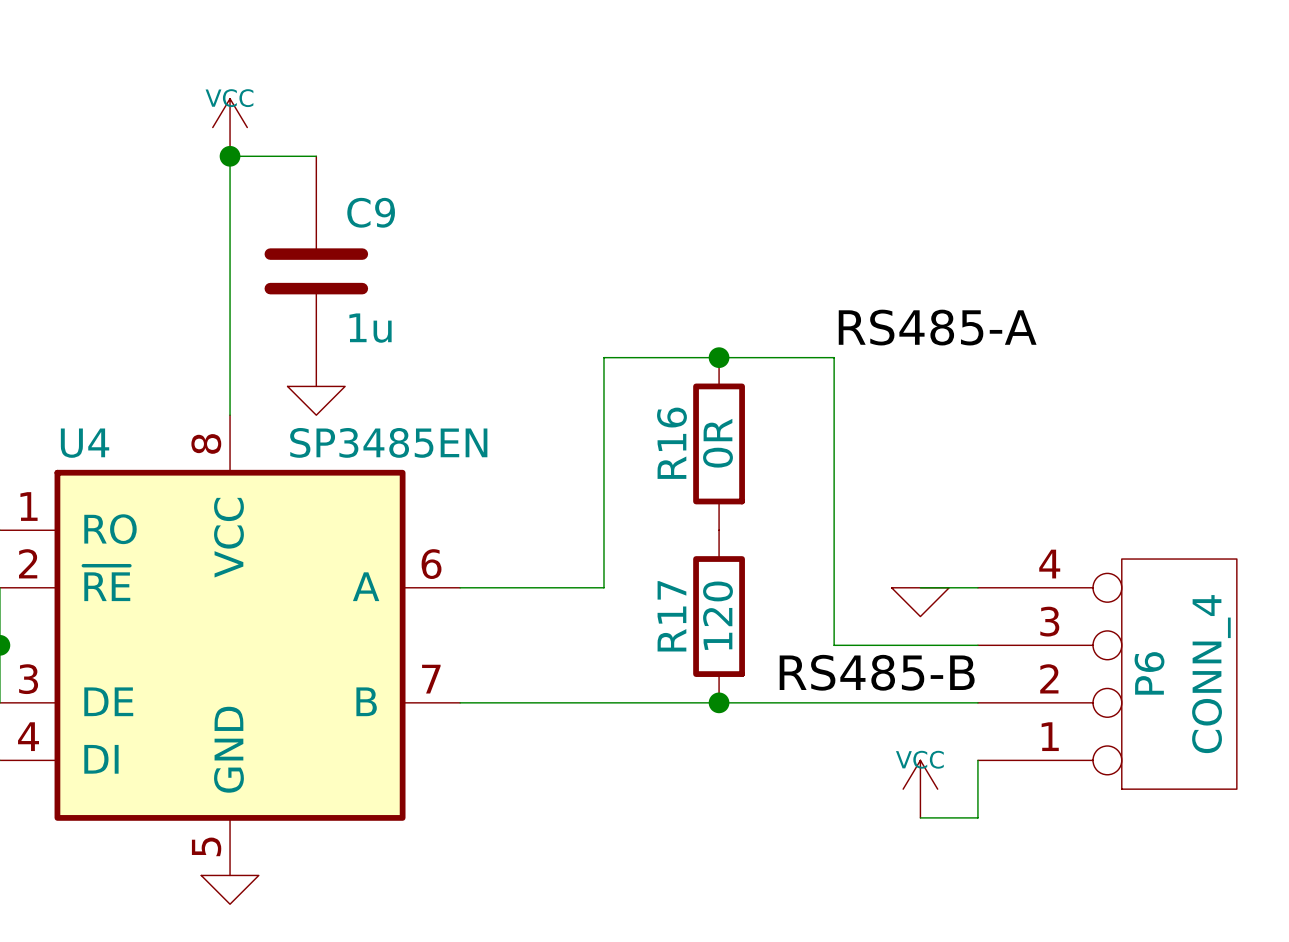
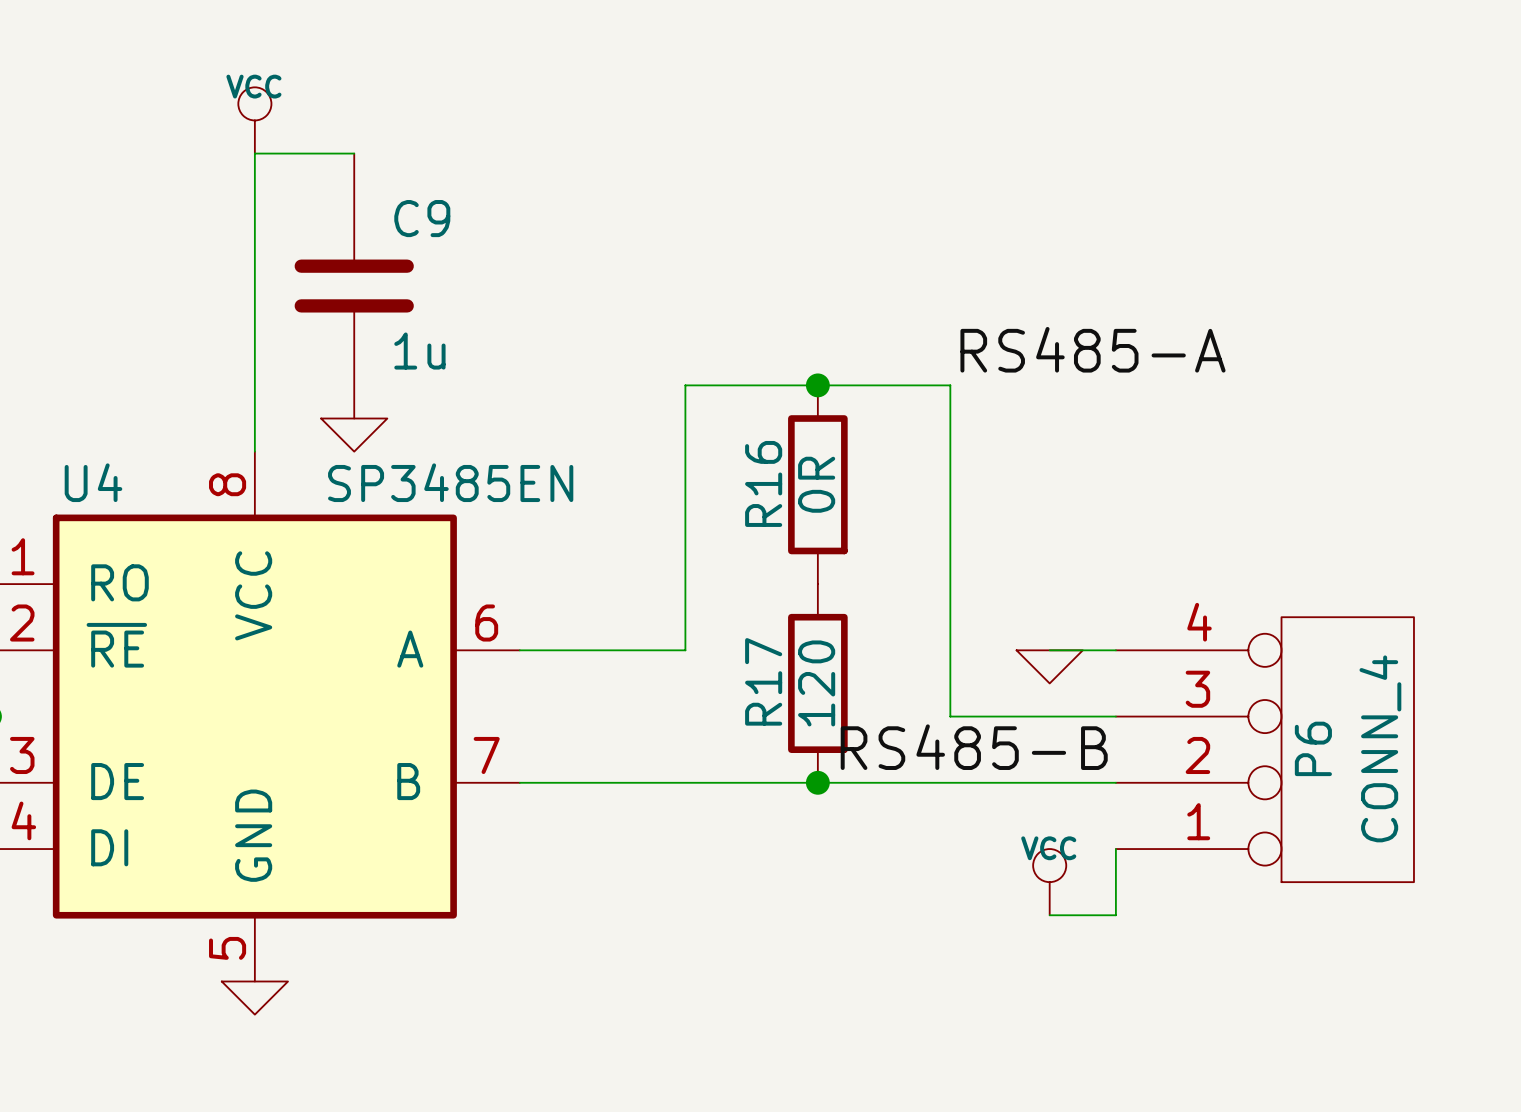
power symbol shape: [212, 98, 248, 157] -> [238, 87, 272, 154]
junction: (230, 156) -> none
power symbol shape: [903, 760, 938, 818] -> [1033, 849, 1067, 916]

